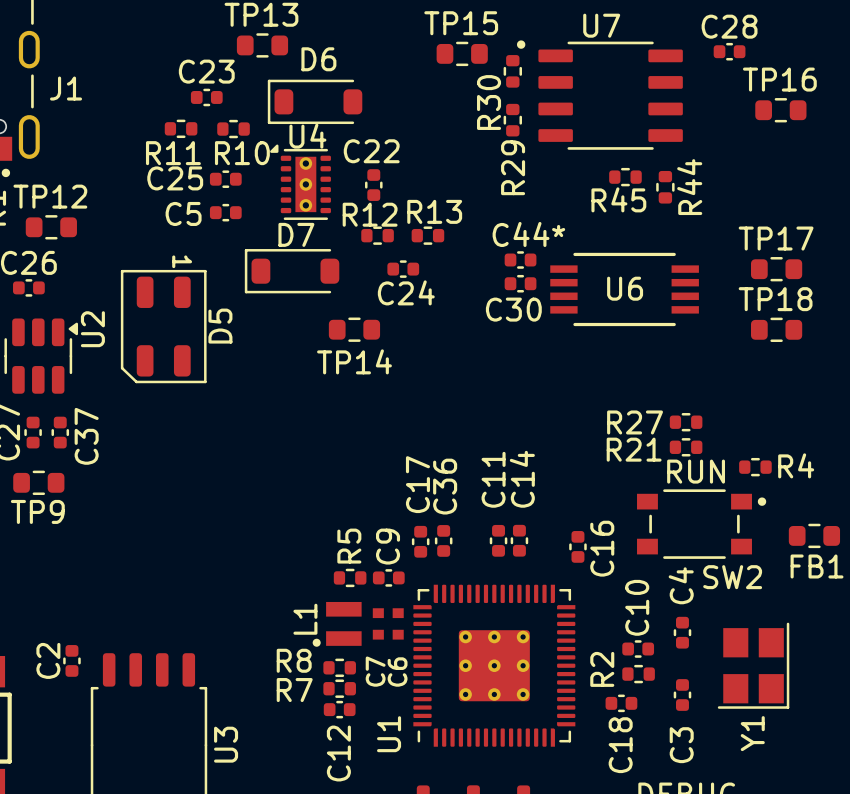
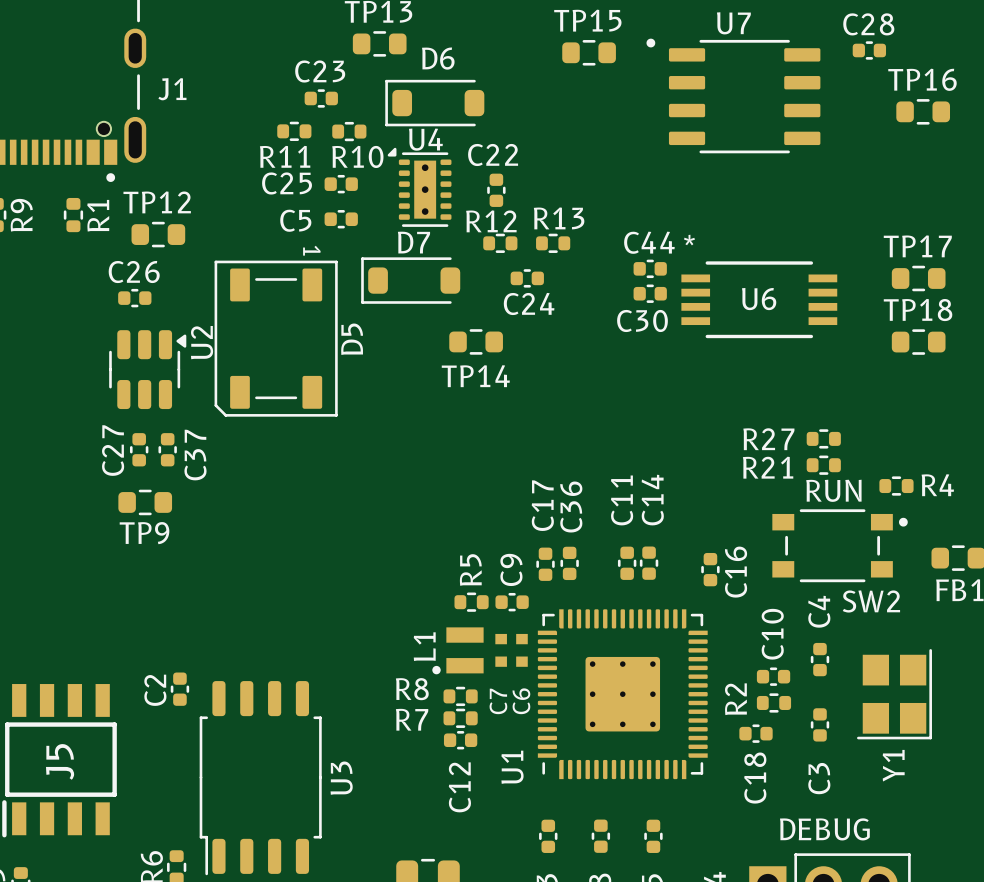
R30: (512, 71) -> none
R29: (512, 120) -> none
R45: (625, 177) -> none
R44: (665, 187) -> none
D5 footprint: [120, 269, 207, 384] -> [214, 260, 338, 417]

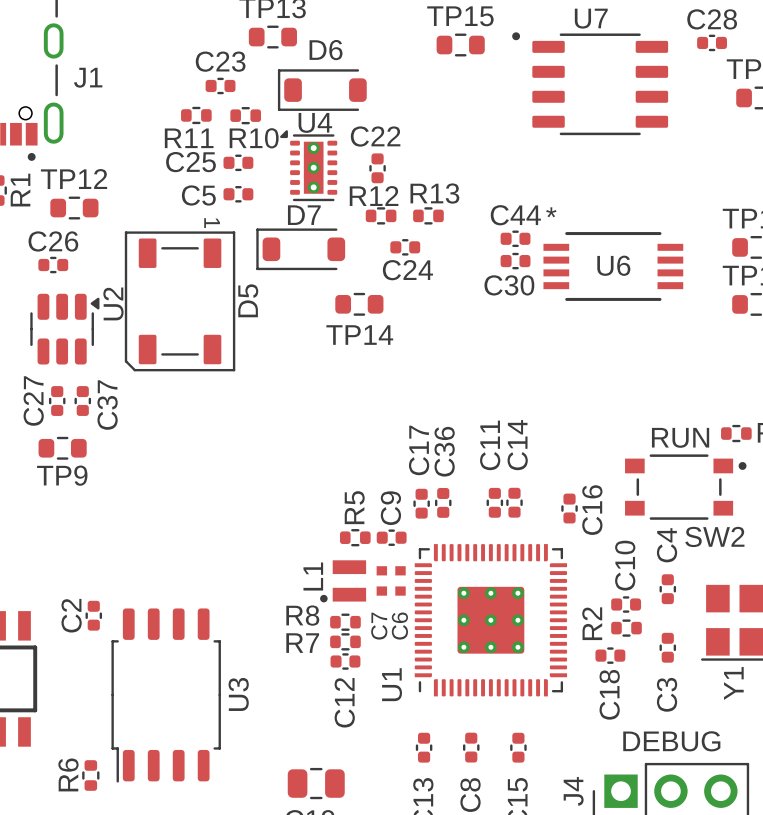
R27: (823, 438) -> none
R21: (823, 465) -> none

